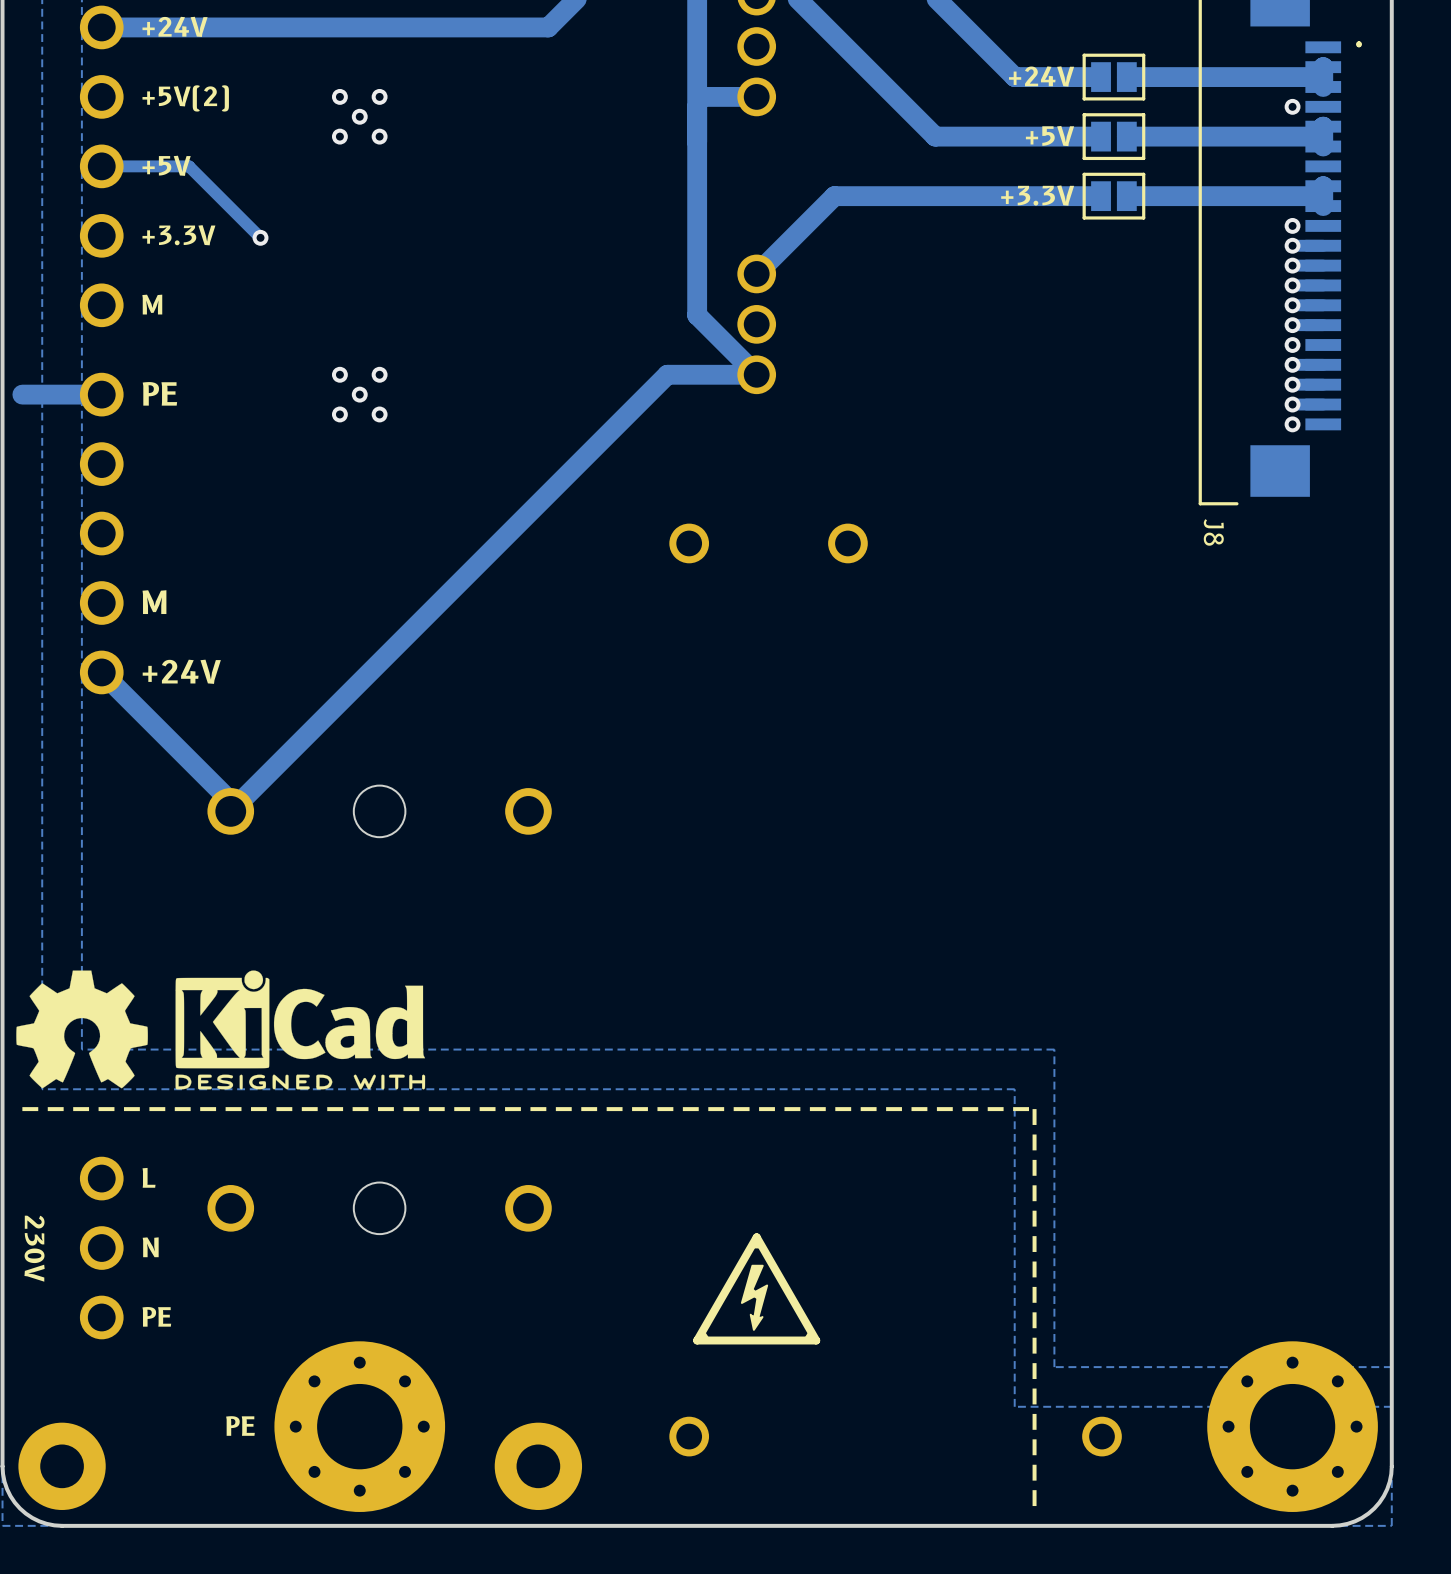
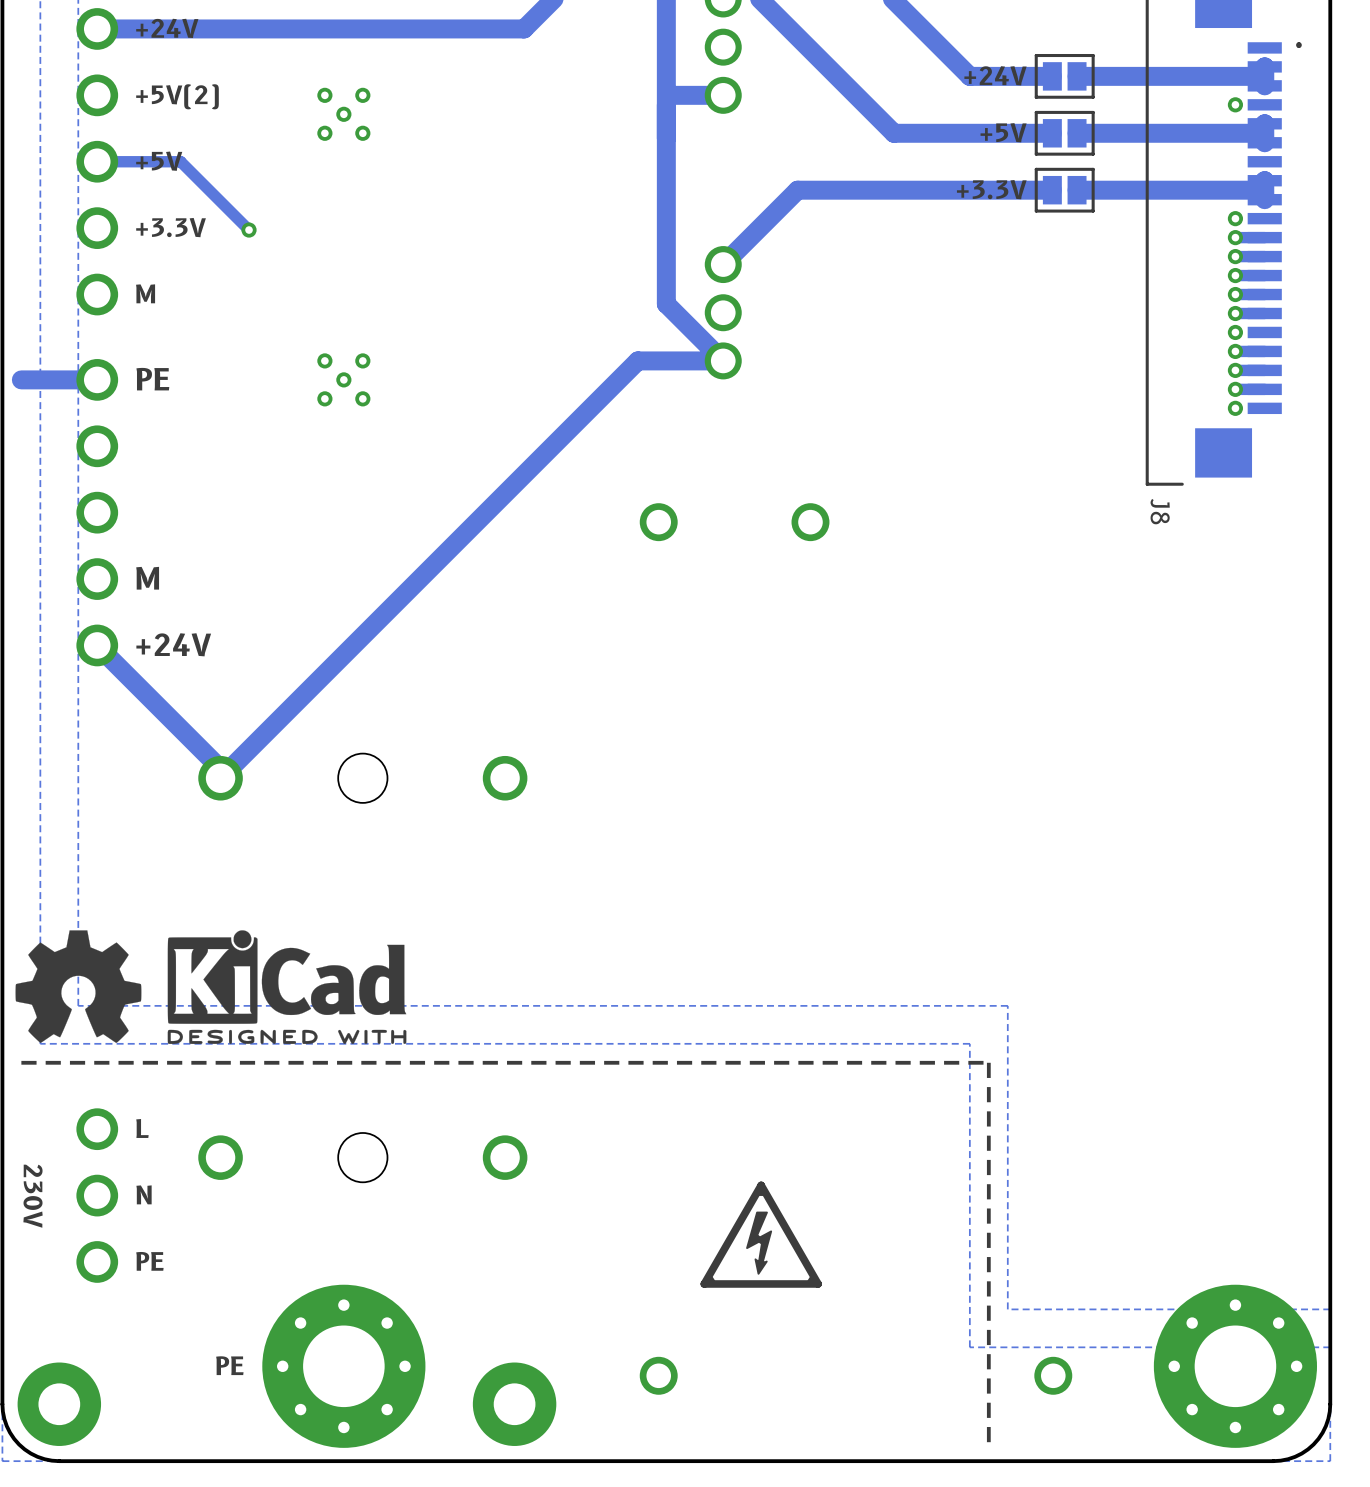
drawing position: (756, 1288) -> (761, 1234)

